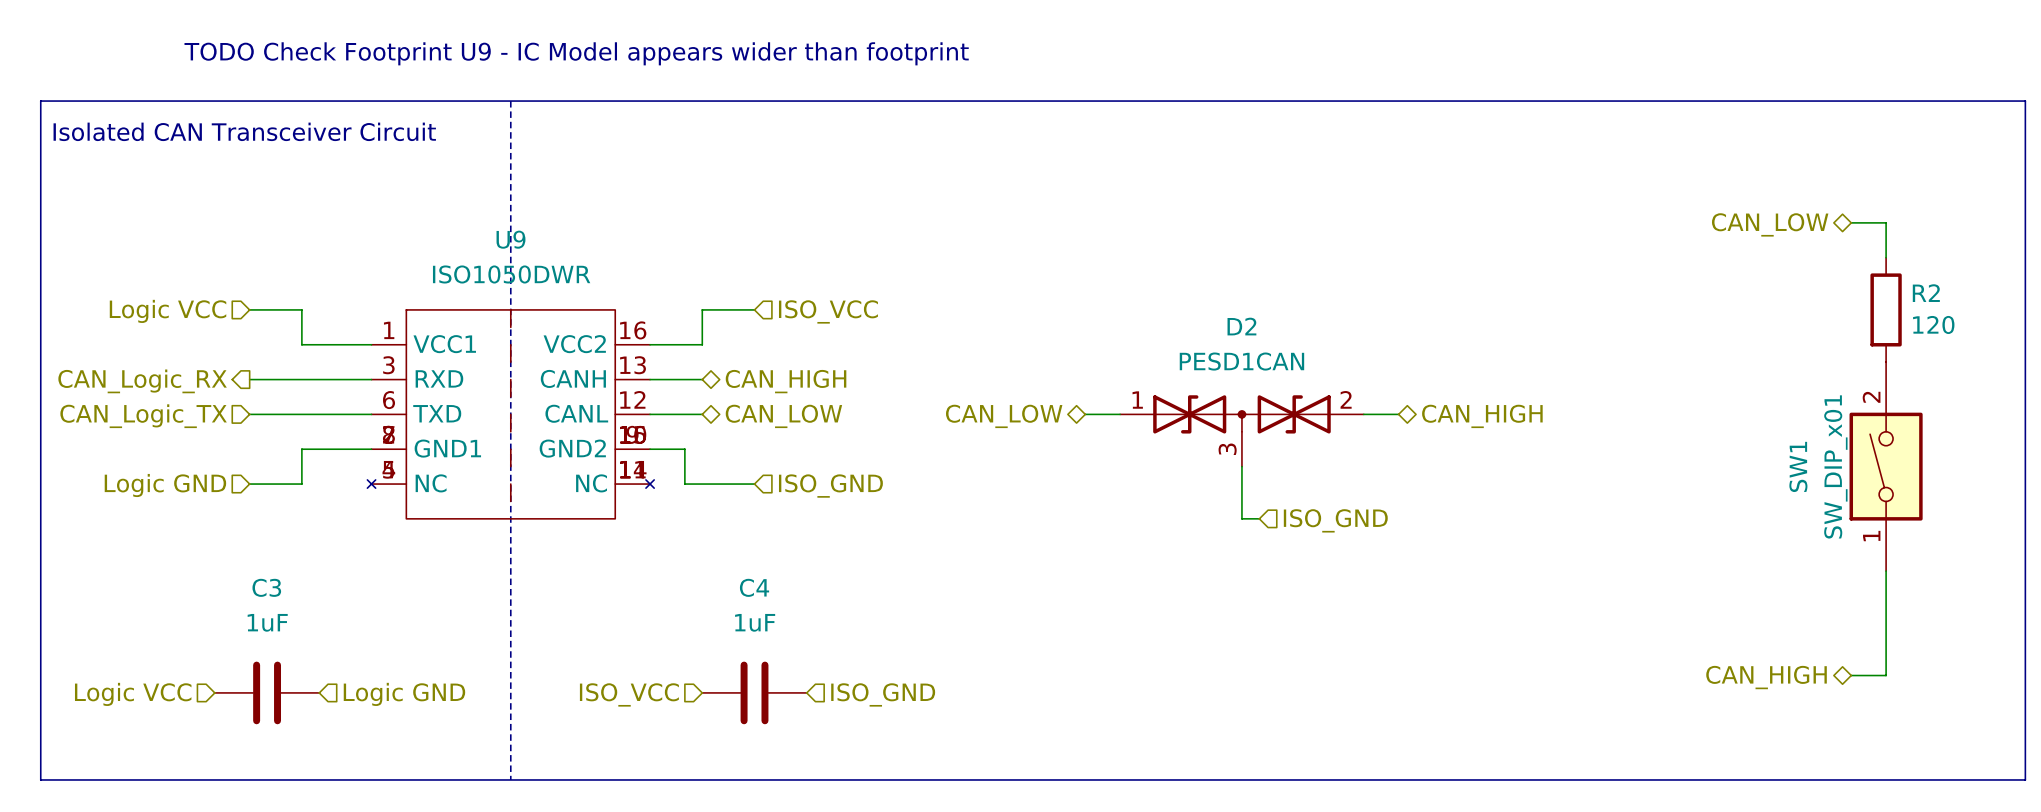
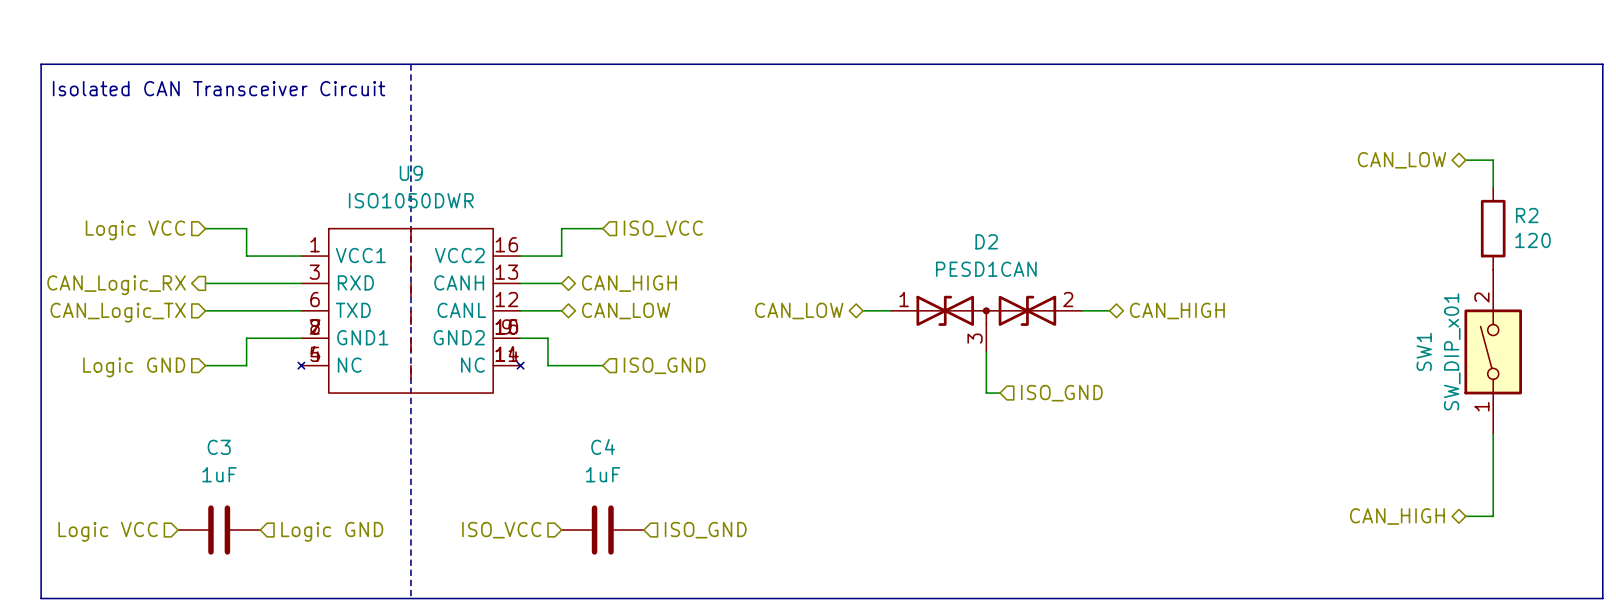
text: TODO Check Footprint U9 - IC Model appears wider than footprint (576, 53) -> none

